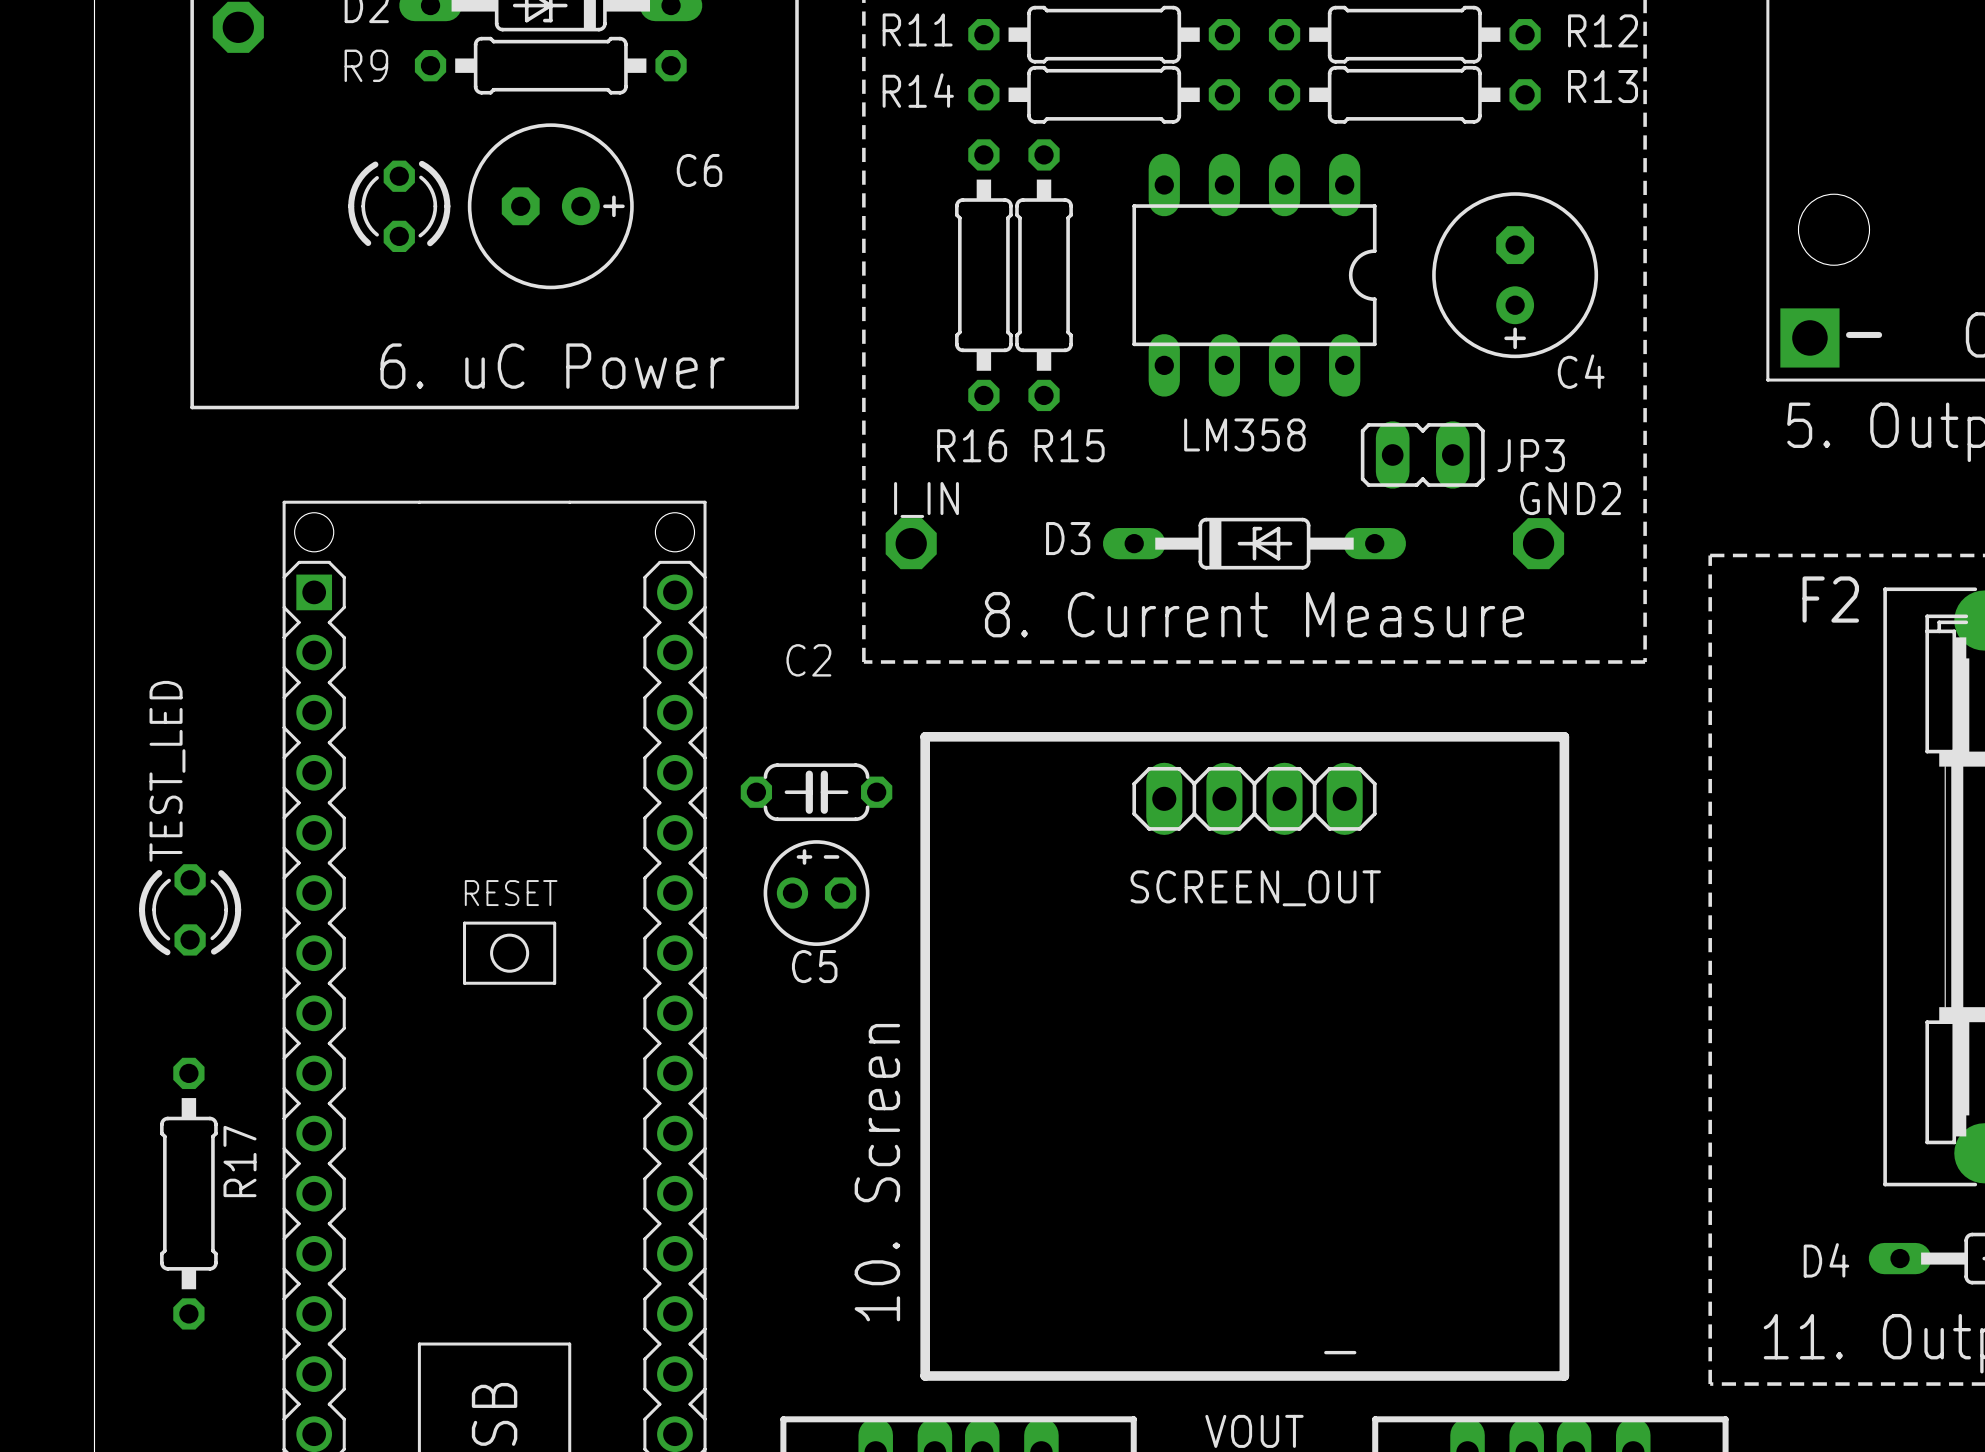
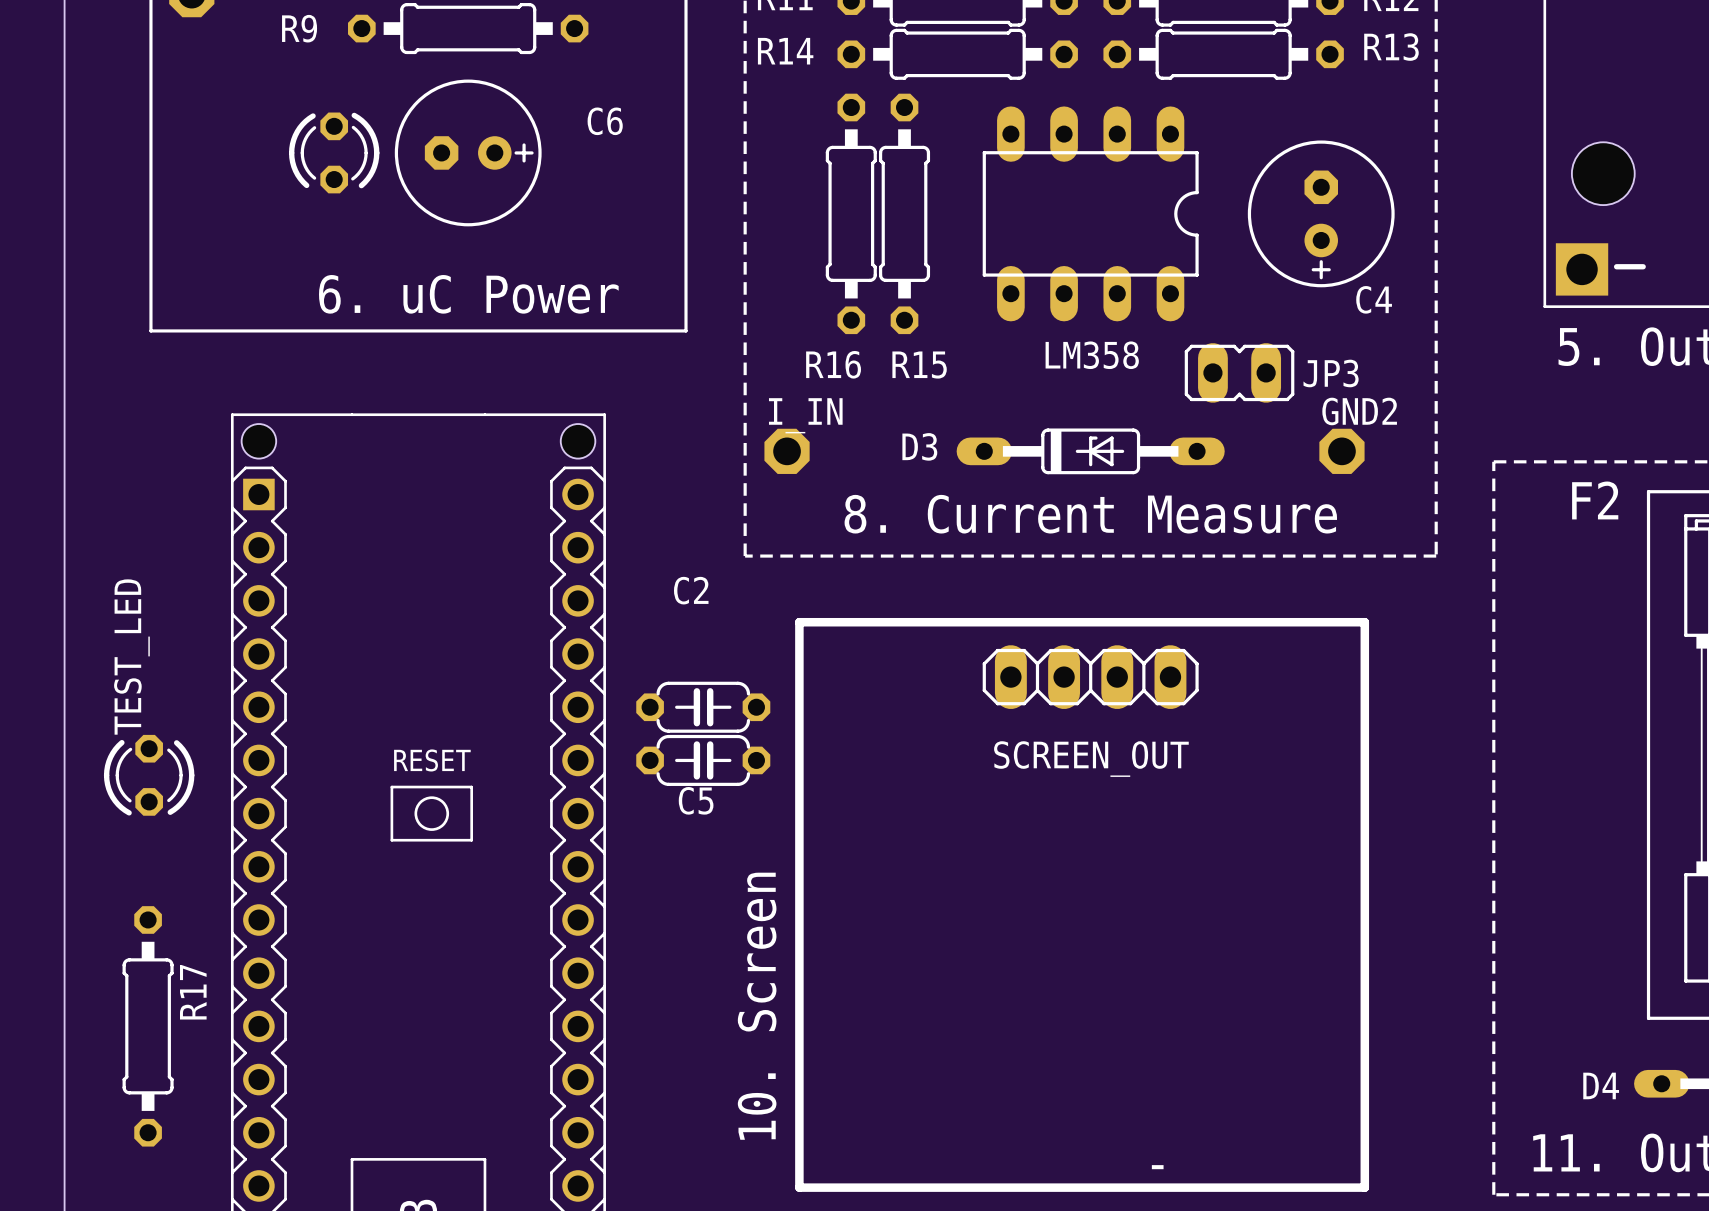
C2 position: (816, 792) -> (703, 707)
C5 footprint: [763, 840, 870, 946] -> [636, 734, 771, 786]

